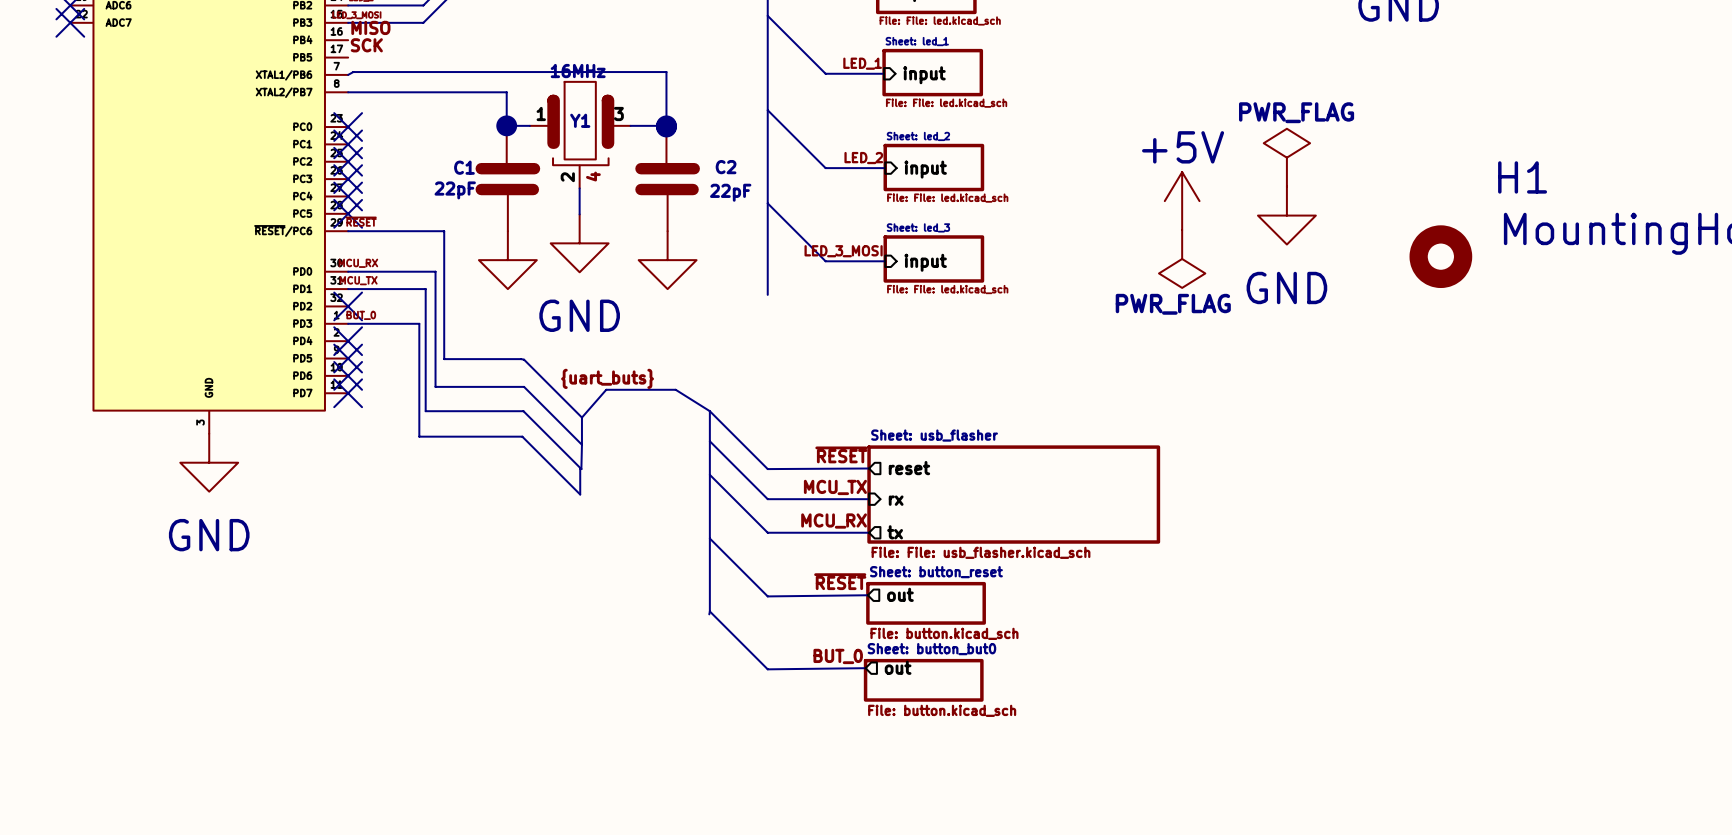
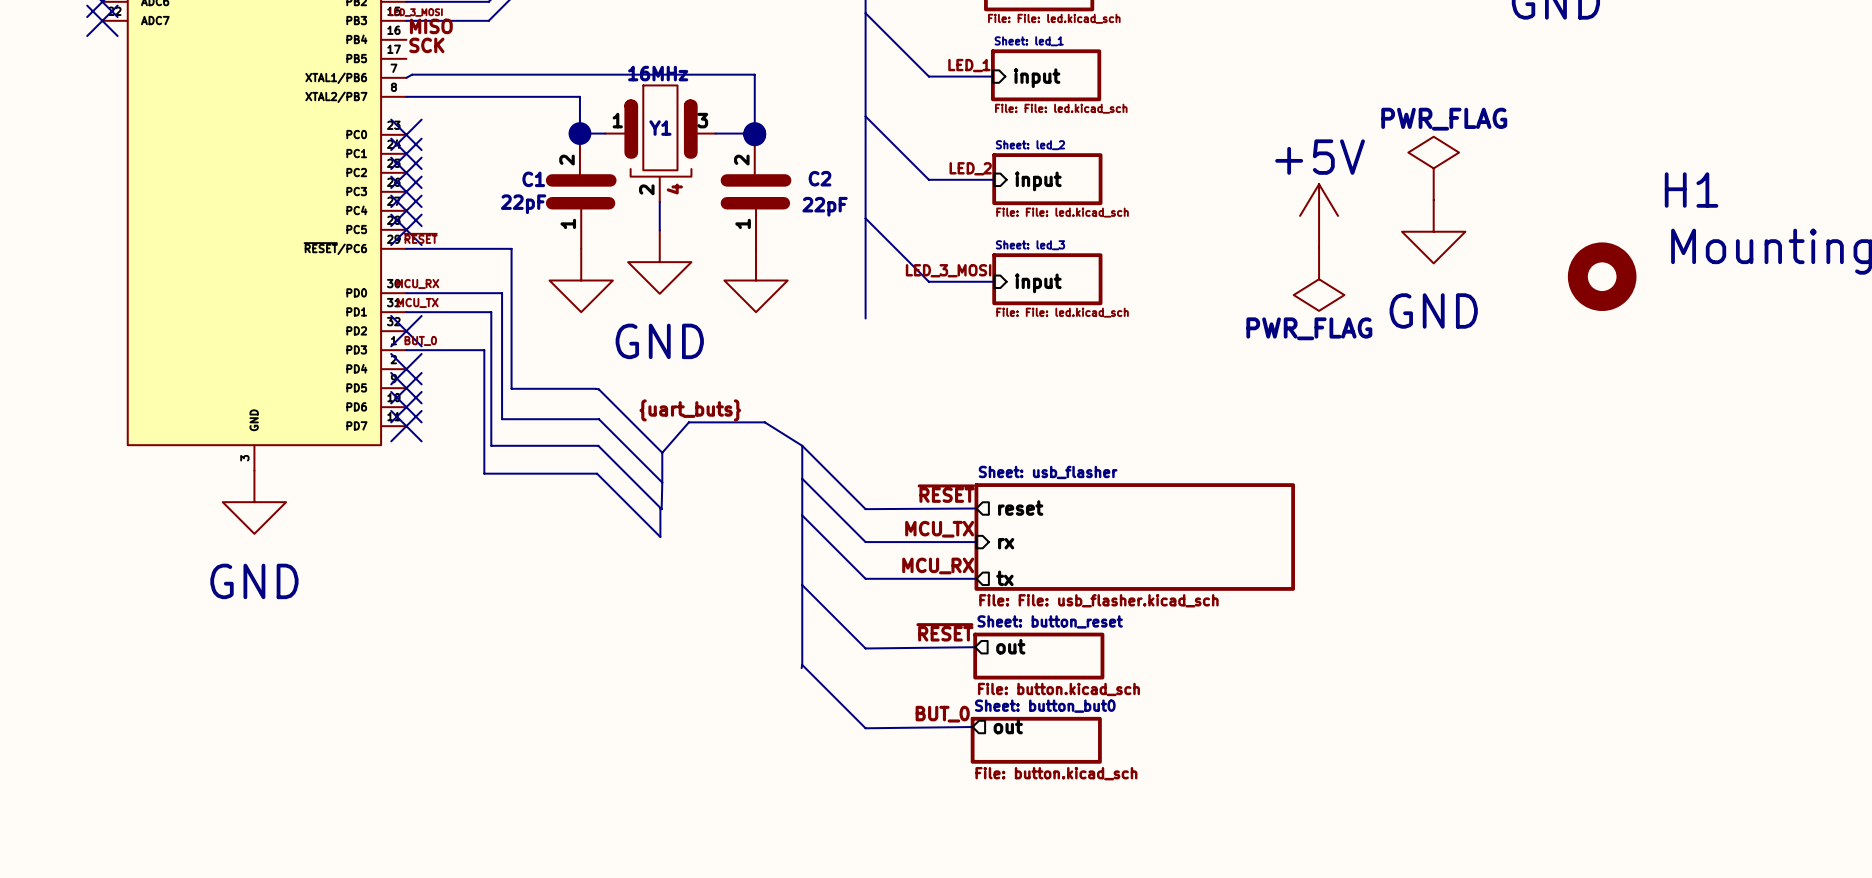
C1 pin number: none -> 2 (566, 160)
C2 pin number: none -> 2 (741, 160)
C1 pin number: none -> 1 (568, 223)
C2 pin number: none -> 1 (743, 223)

